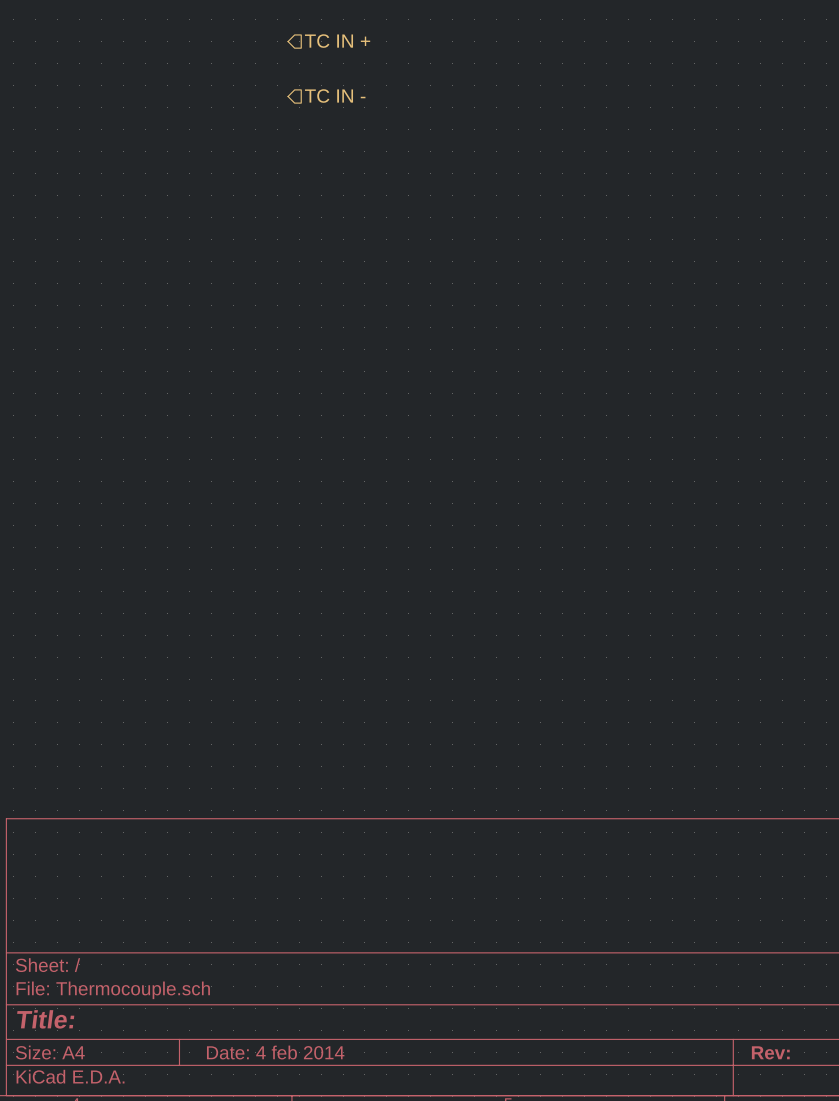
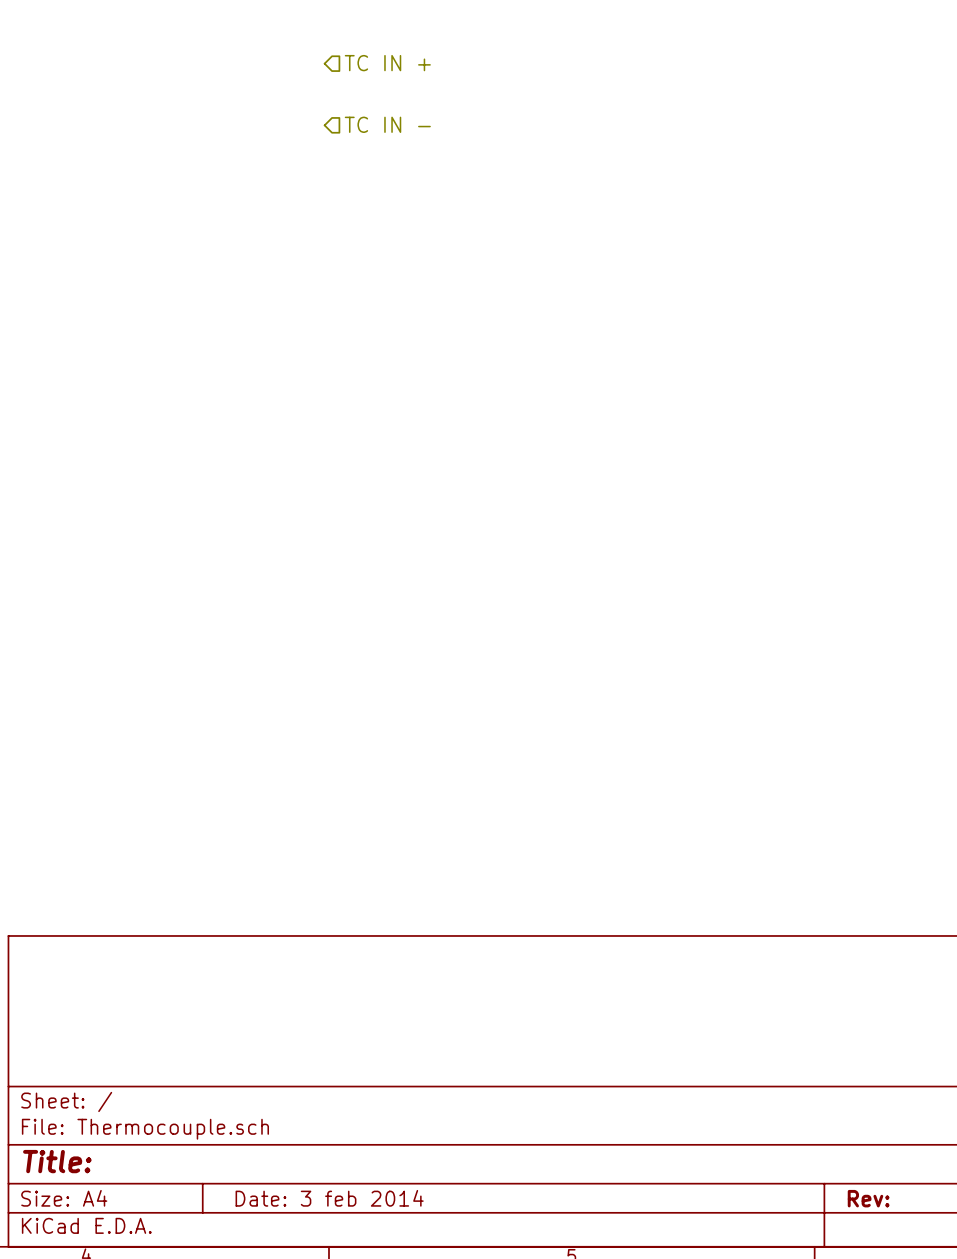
title block: Date: 4 feb 2014 (275, 1052) -> Date: 3 feb 2014 (329, 1198)

